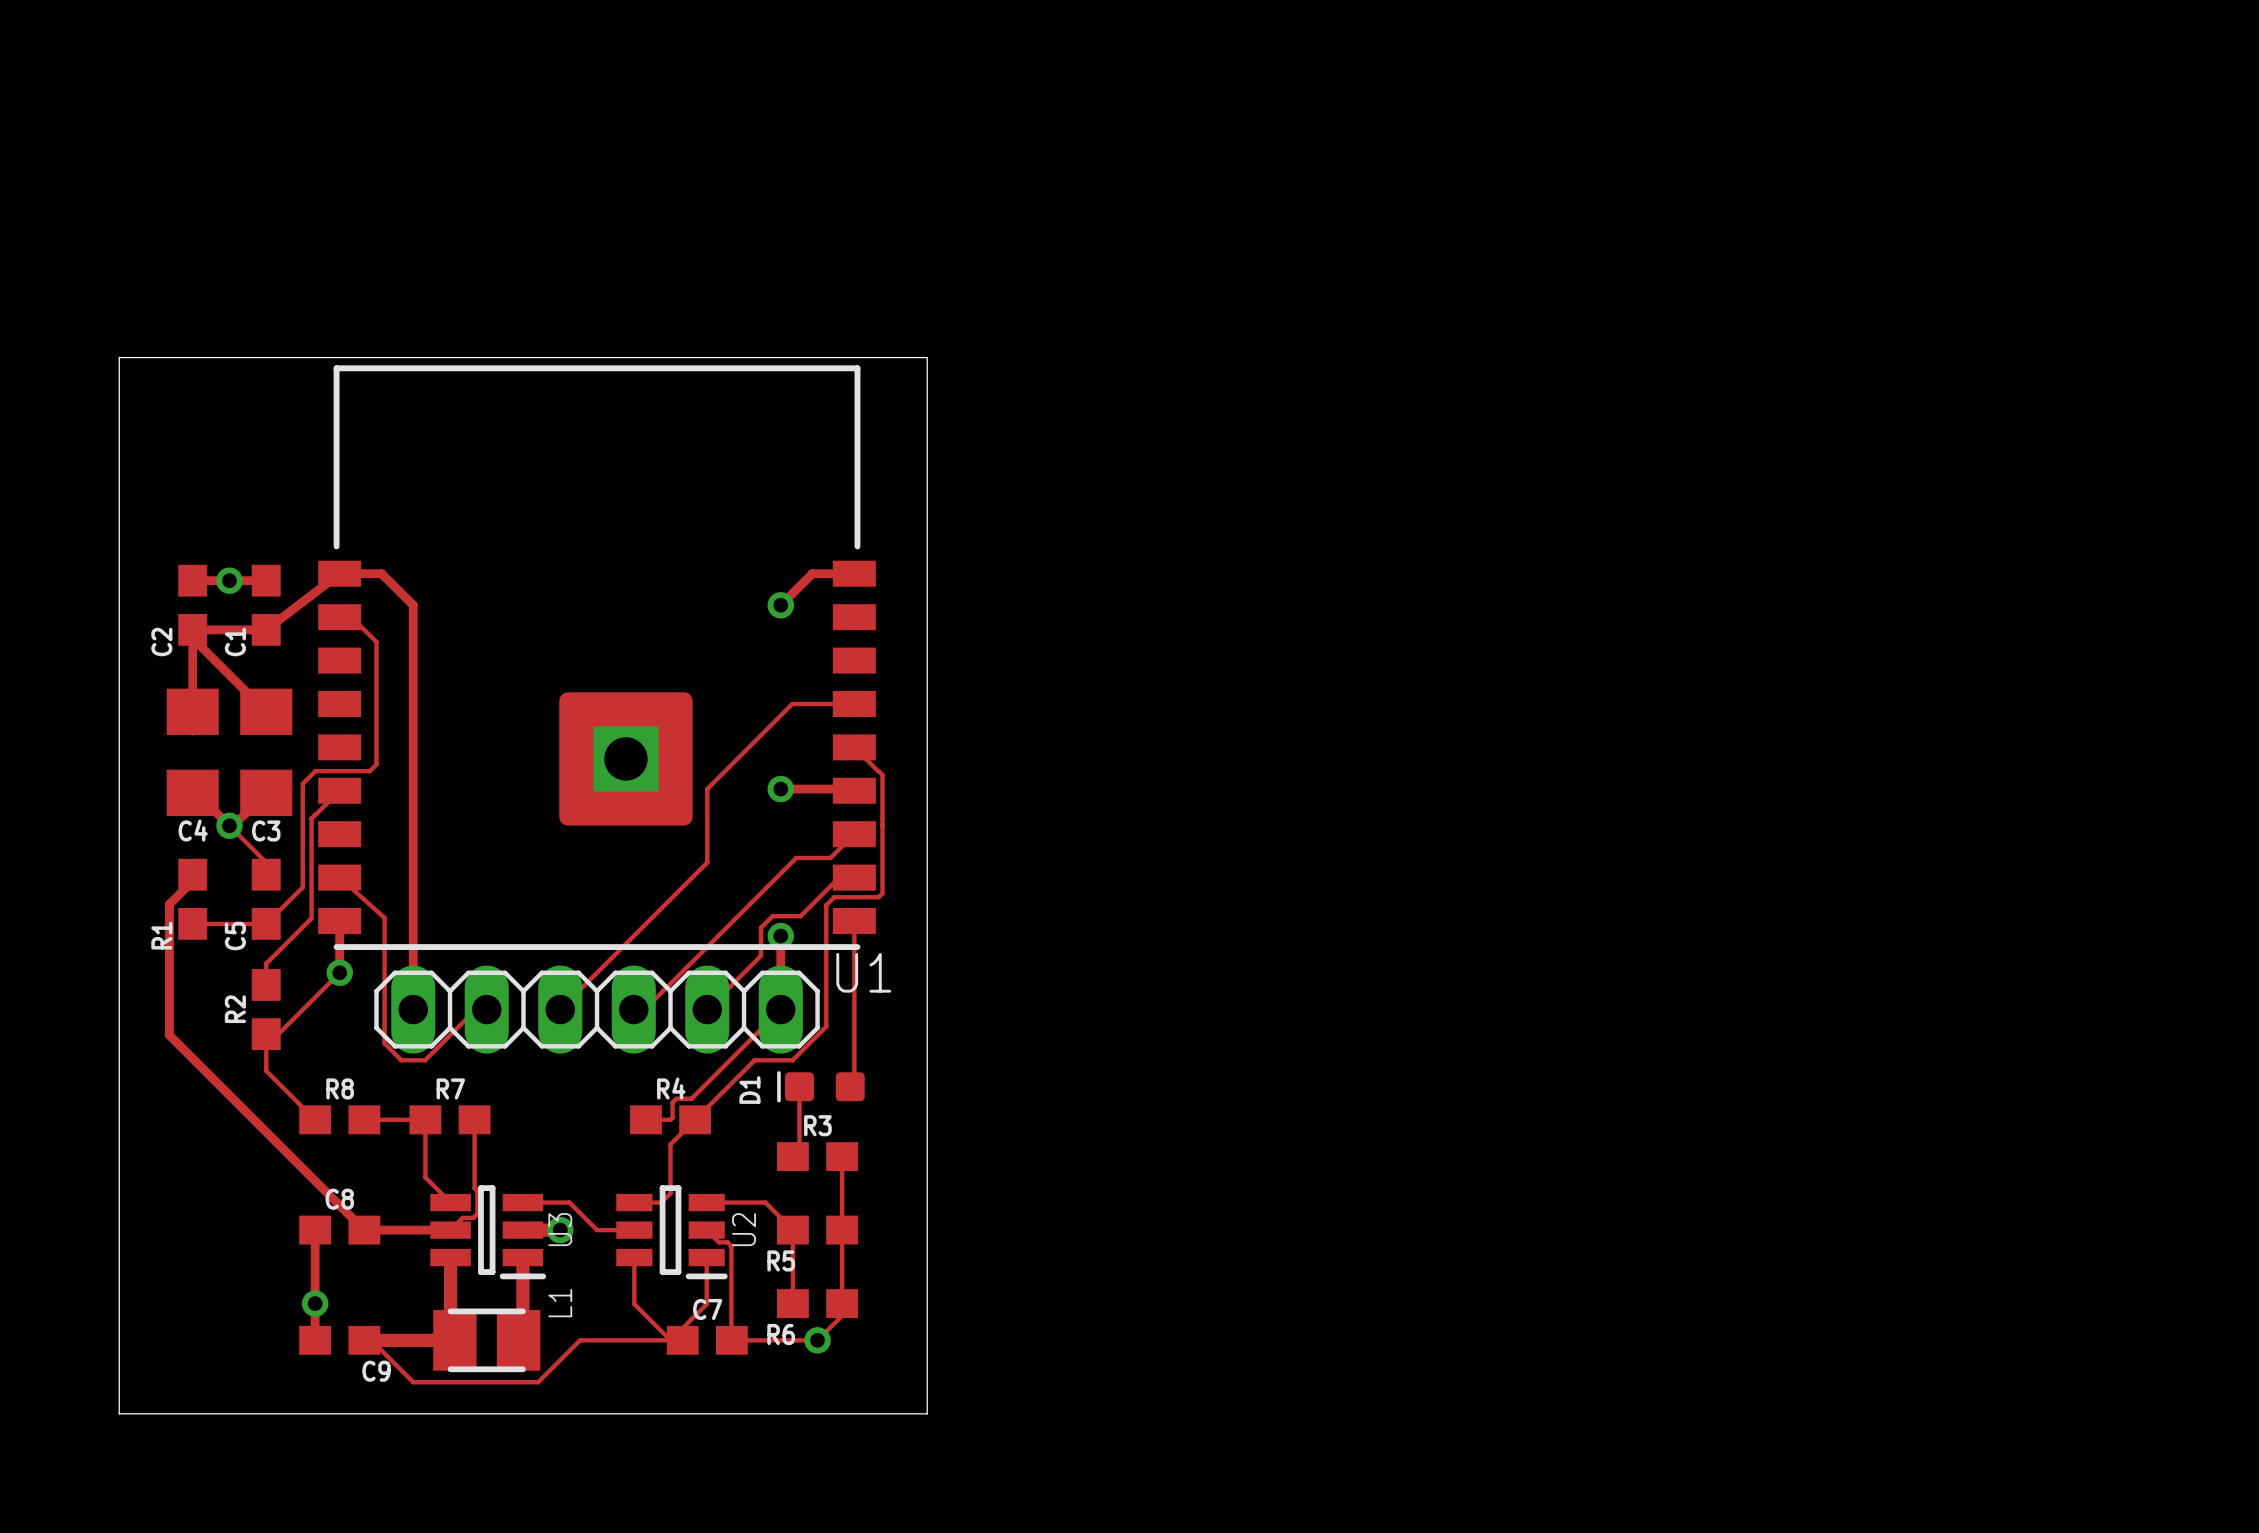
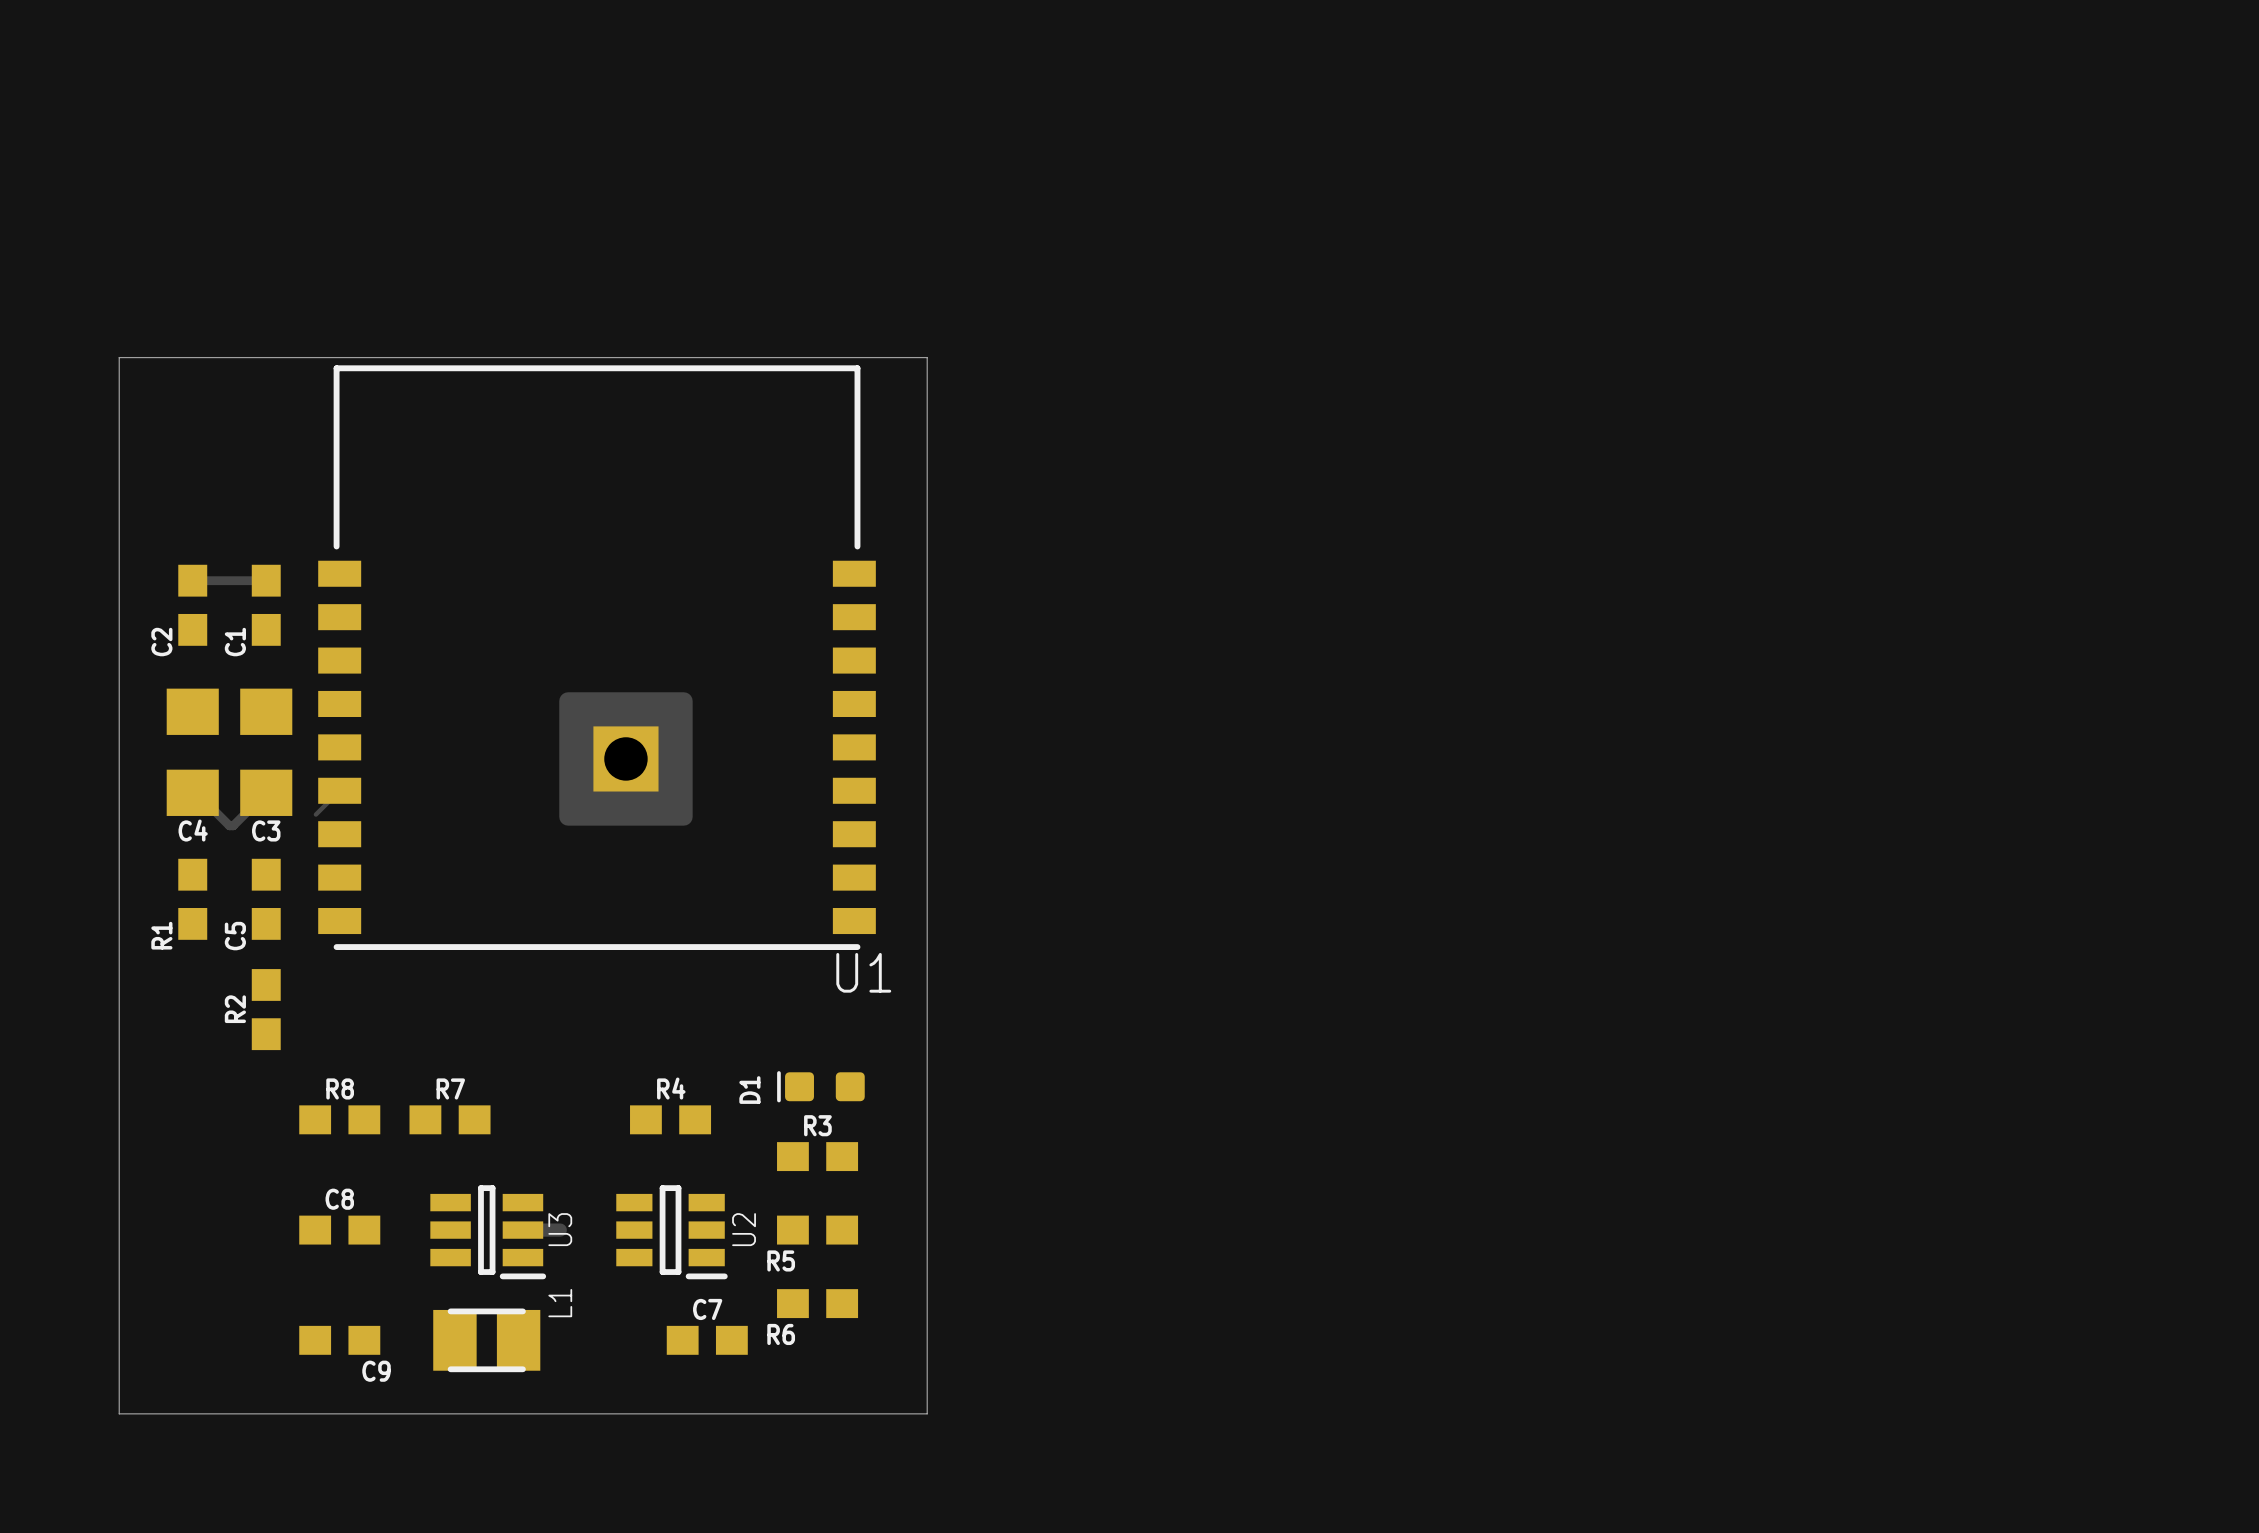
track: (854, 573) (812, 573) (780, 605) -> none
via: (229, 580) -> none
via: (780, 605) -> none
track: (339, 617) (351, 617) (376, 642) (376, 764) (369, 771) (315, 771) (302, 783) (302, 887) (266, 923) (192, 923) -> none
track: (192, 638) (266, 711) -> none
track: (854, 703) (792, 703) (707, 789) (707, 862) (560, 1009) -> none
track: (192, 731) (192, 629) (266, 629) (339, 573) (381, 573) (413, 605) (413, 1009) -> none
track: (854, 747) (878, 771) -> none
track: (878, 771) (882, 775) (882, 893) (878, 897) (834, 897) (826, 905) (826, 1026) (792, 1060) (754, 1060) (670, 1144) (670, 1193) (661, 1202) (634, 1202) -> none
track: (780, 789) (852, 789) (854, 790) -> none
via: (780, 789) -> none
track: (315, 814) (311, 818) (311, 918) (266, 963) (266, 984) -> none
track: (229, 825) (266, 862) (266, 874) -> none
via: (229, 825) -> none
track: (854, 834) (830, 857) (796, 857) (644, 1009) (633, 1009) -> none
track: (192, 874) (192, 881) (169, 904) (169, 1035) (364, 1230) (450, 1230) (462, 1217) (473, 1217) (477, 1214) (477, 1191) (474, 1188) (474, 1119) -> none
track: (339, 877) (384, 917) (384, 1043) (401, 1060) (425, 1060) (475, 1009) (486, 1009) -> none
track: (854, 877) (839, 877) (800, 916) (772, 916) (760, 927) (760, 955) (707, 1009) -> none
track: (339, 921) (339, 972) (278, 1034) (266, 1034) (266, 1070) (315, 1119) -> none
track: (854, 921) (854, 1082) (850, 1086) -> none
track: (780, 936) (780, 1009) (691, 1098) (676, 1098) (672, 1102) (672, 1117) (670, 1119) (645, 1119) -> none
via: (780, 936) -> none
via: (339, 972) -> none
part: (597, 1009) -> none
track: (799, 1086) (799, 1150) (792, 1156) -> none
track: (364, 1119) (425, 1119) (425, 1177) (450, 1202) -> none
track: (842, 1156) (842, 1315) (817, 1340) (731, 1340) (731, 1246) (727, 1242) (718, 1242) (706, 1230) -> none
track: (522, 1202) (569, 1202) (597, 1230) (634, 1230) -> none
track: (706, 1202) (765, 1202) (792, 1230) (792, 1303) -> none
track: (315, 1230) (315, 1340) -> none
via: (560, 1230) -> none
track: (450, 1257) (450, 1336) (454, 1340) (364, 1340) (371, 1340) (413, 1382) (538, 1382) (580, 1340) (682, 1340) -> none
track: (522, 1257) (522, 1336) (518, 1340) -> none
track: (634, 1257) (634, 1304) (670, 1340) (706, 1304) (706, 1257) -> none
via: (315, 1303) -> none
via: (817, 1340) -> none

